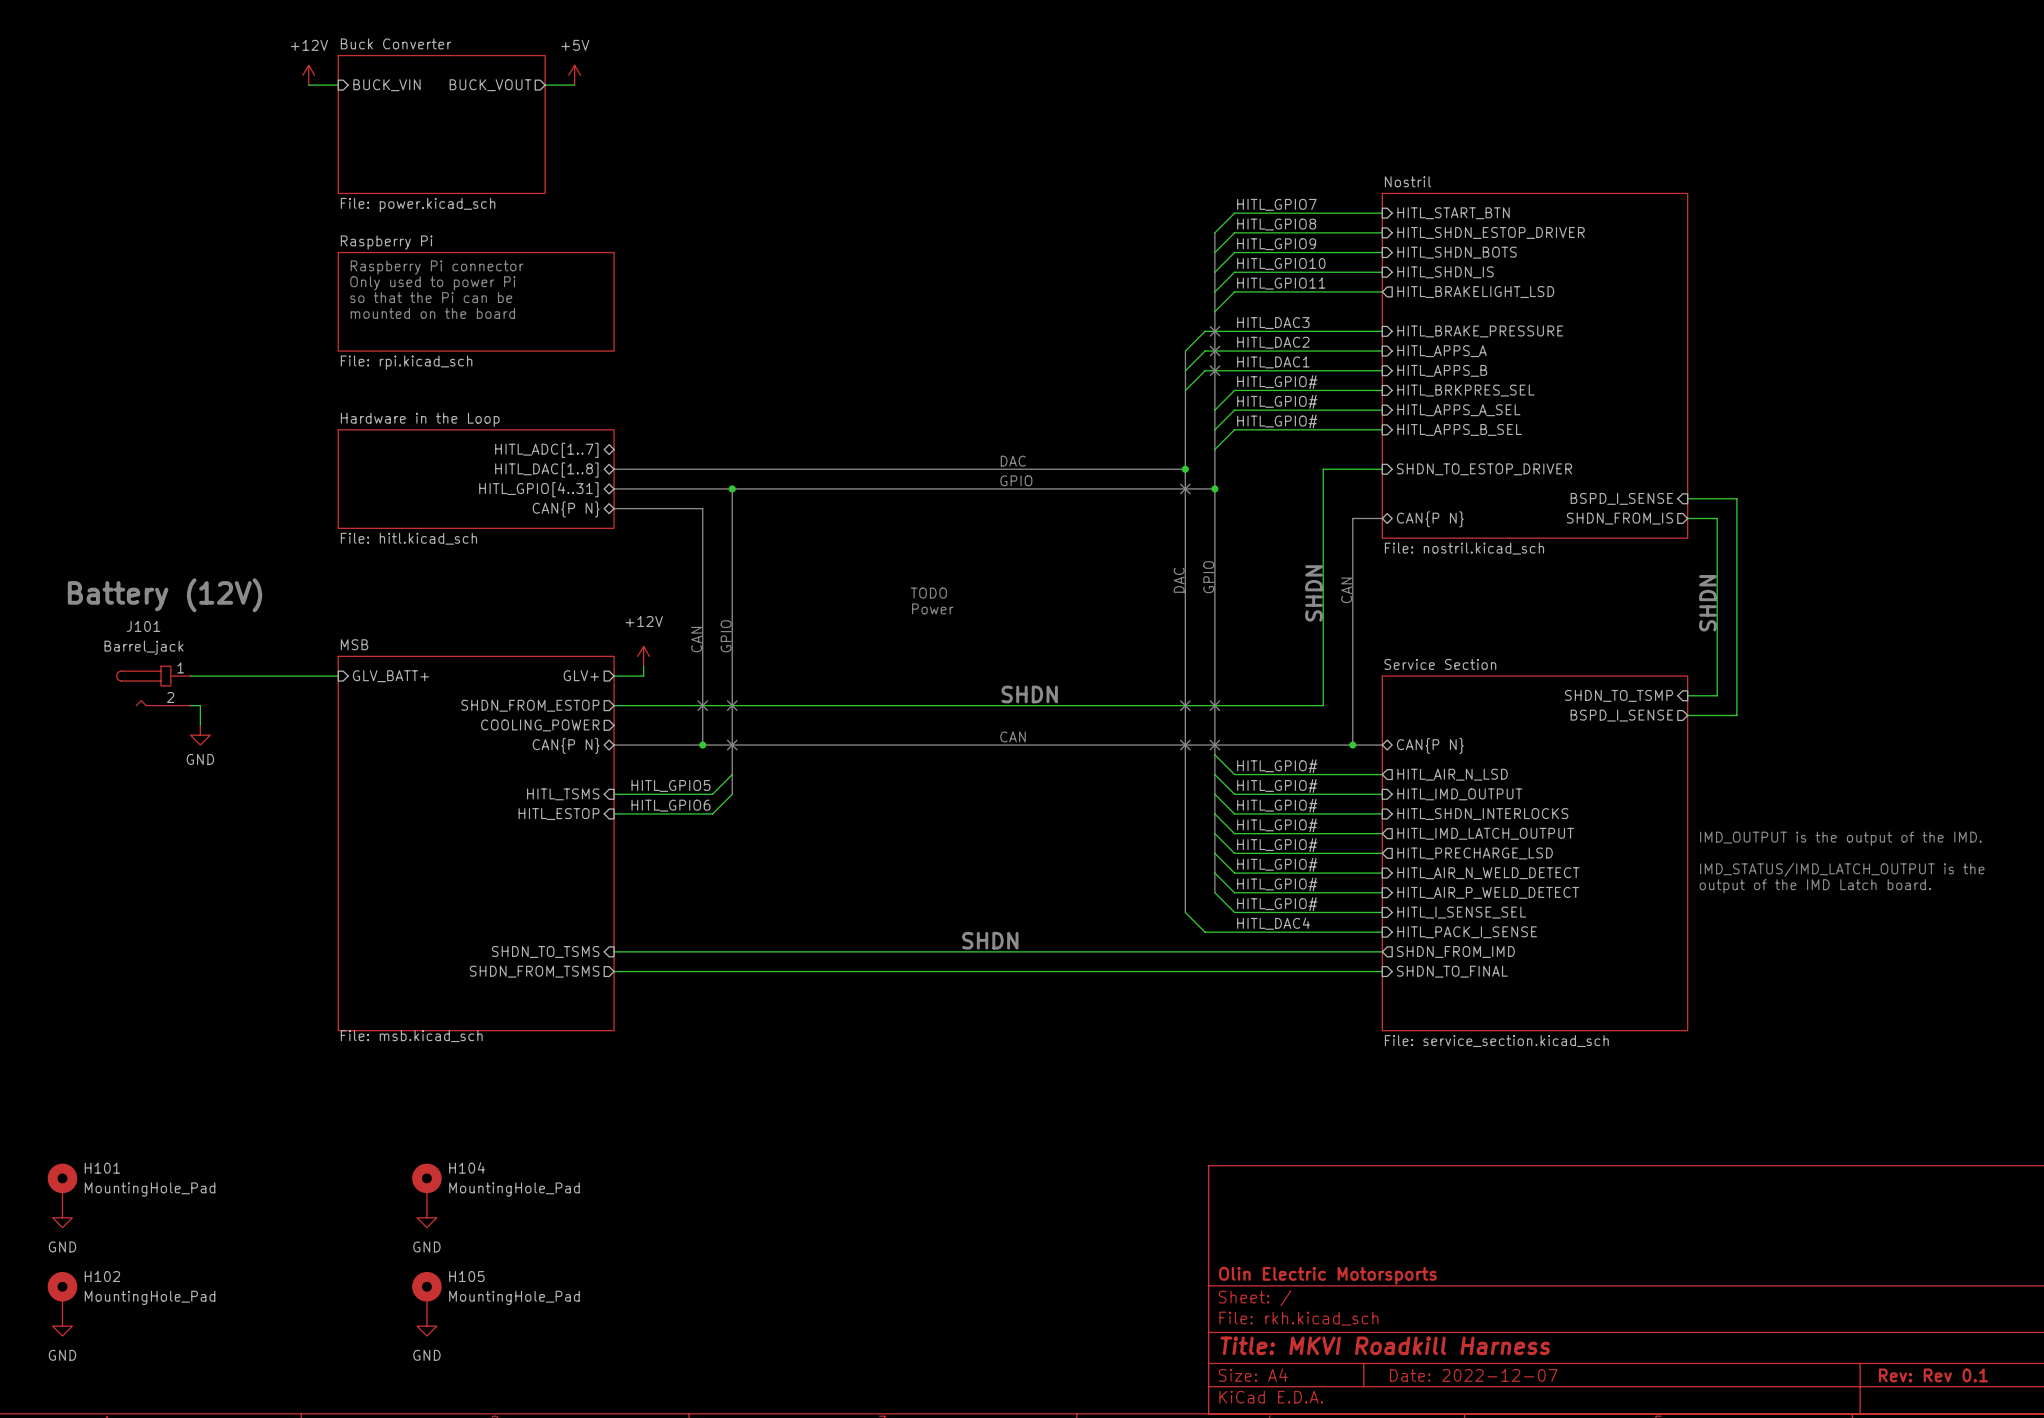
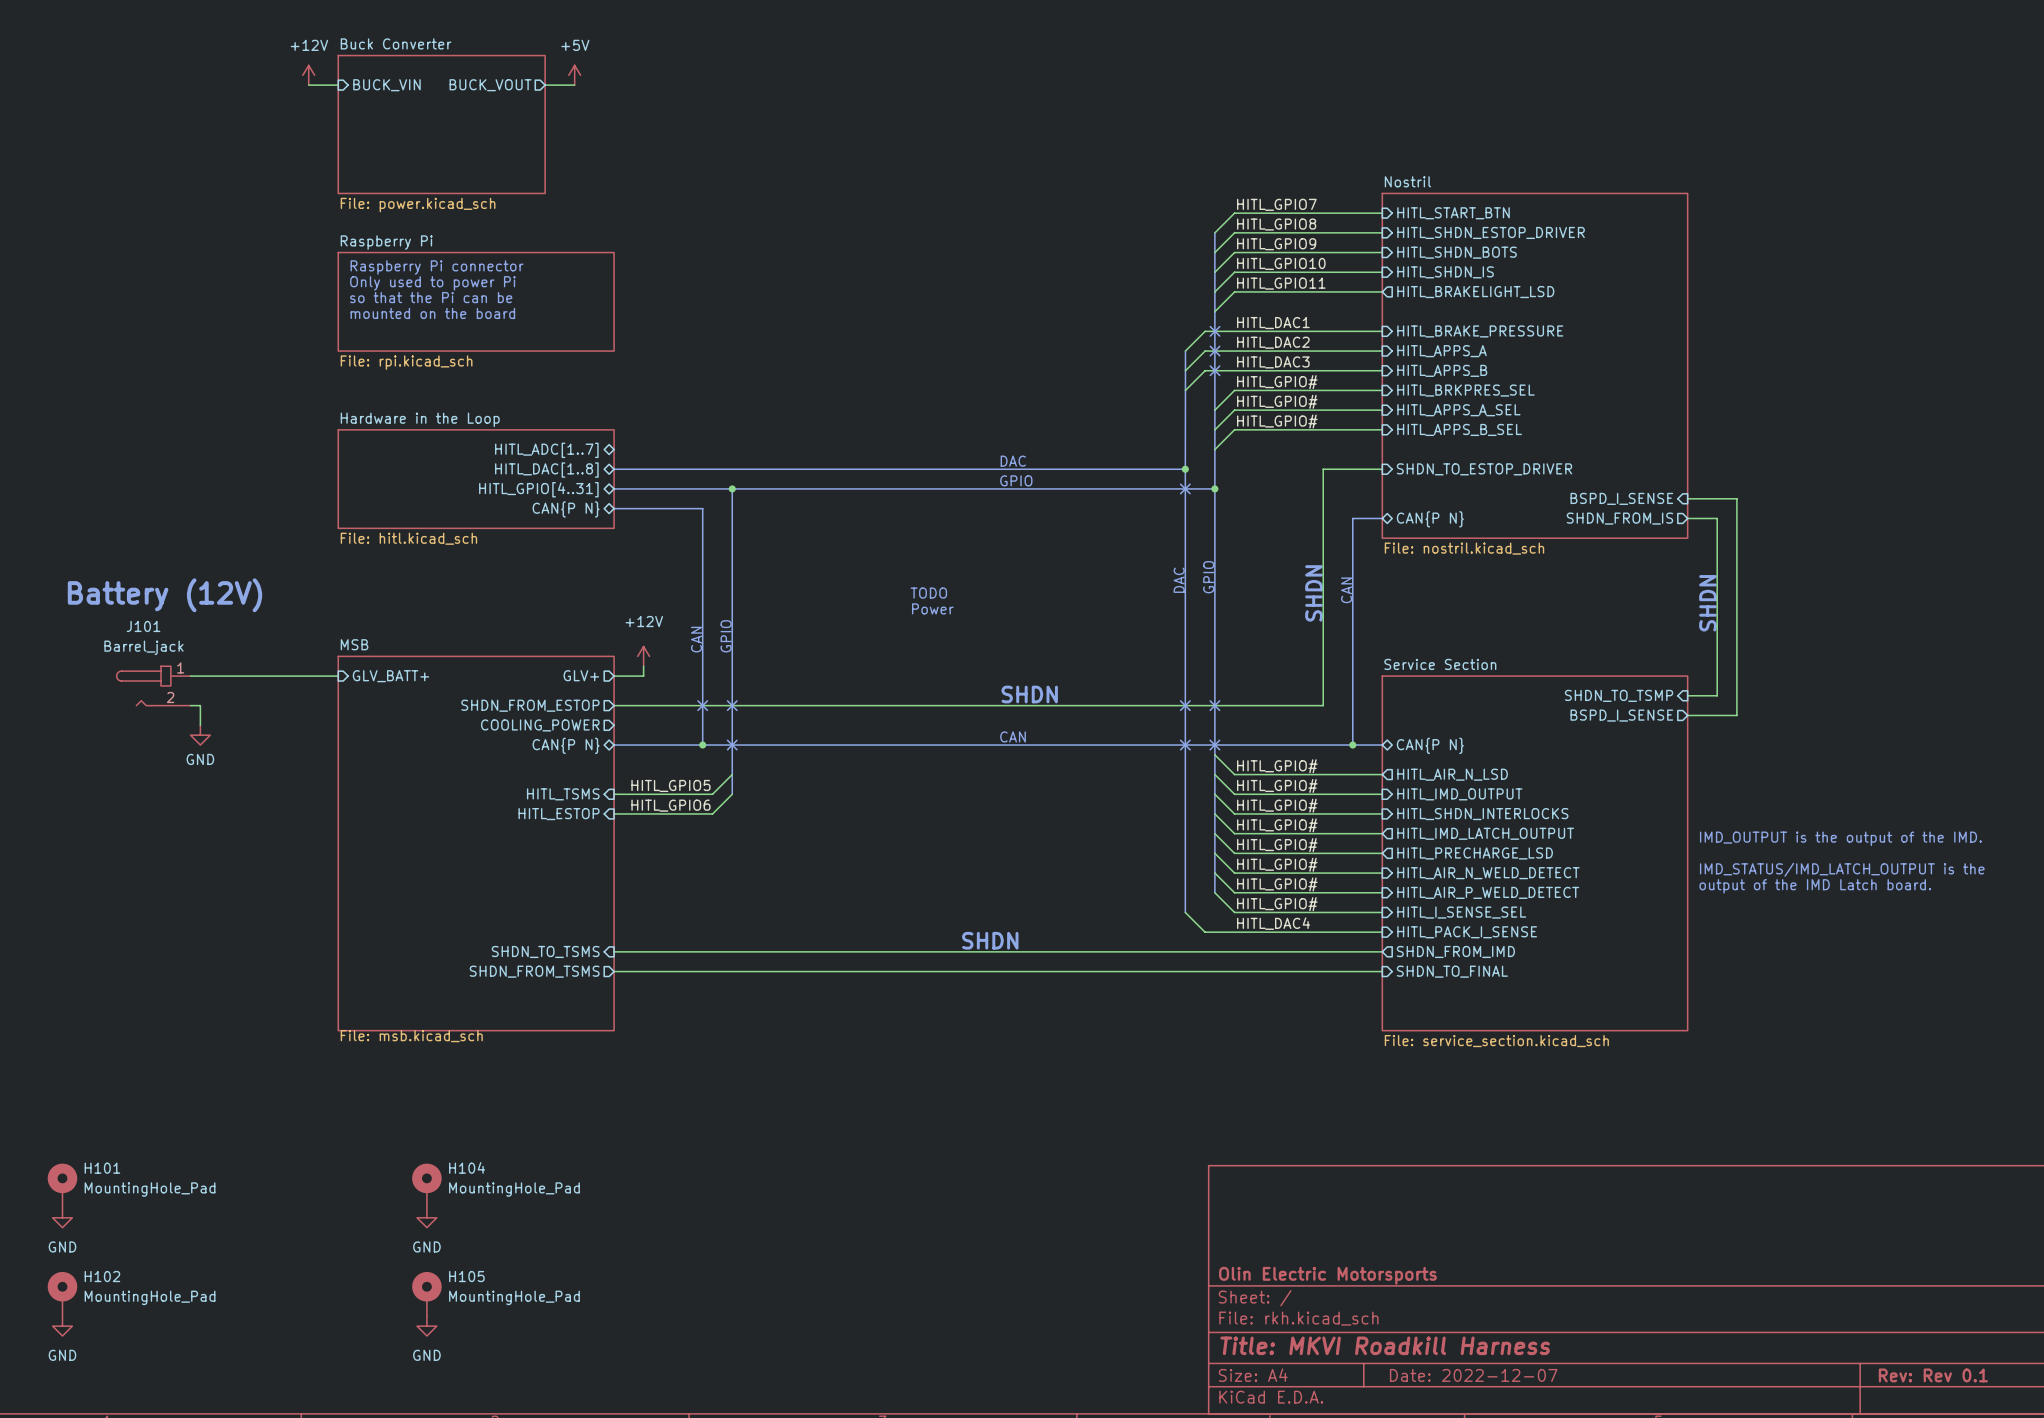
label: HITL_DAC3 (1273, 323) -> HITL_DAC1 (1273, 323)
label: HITL_DAC1 (1273, 362) -> HITL_DAC3 (1273, 362)

